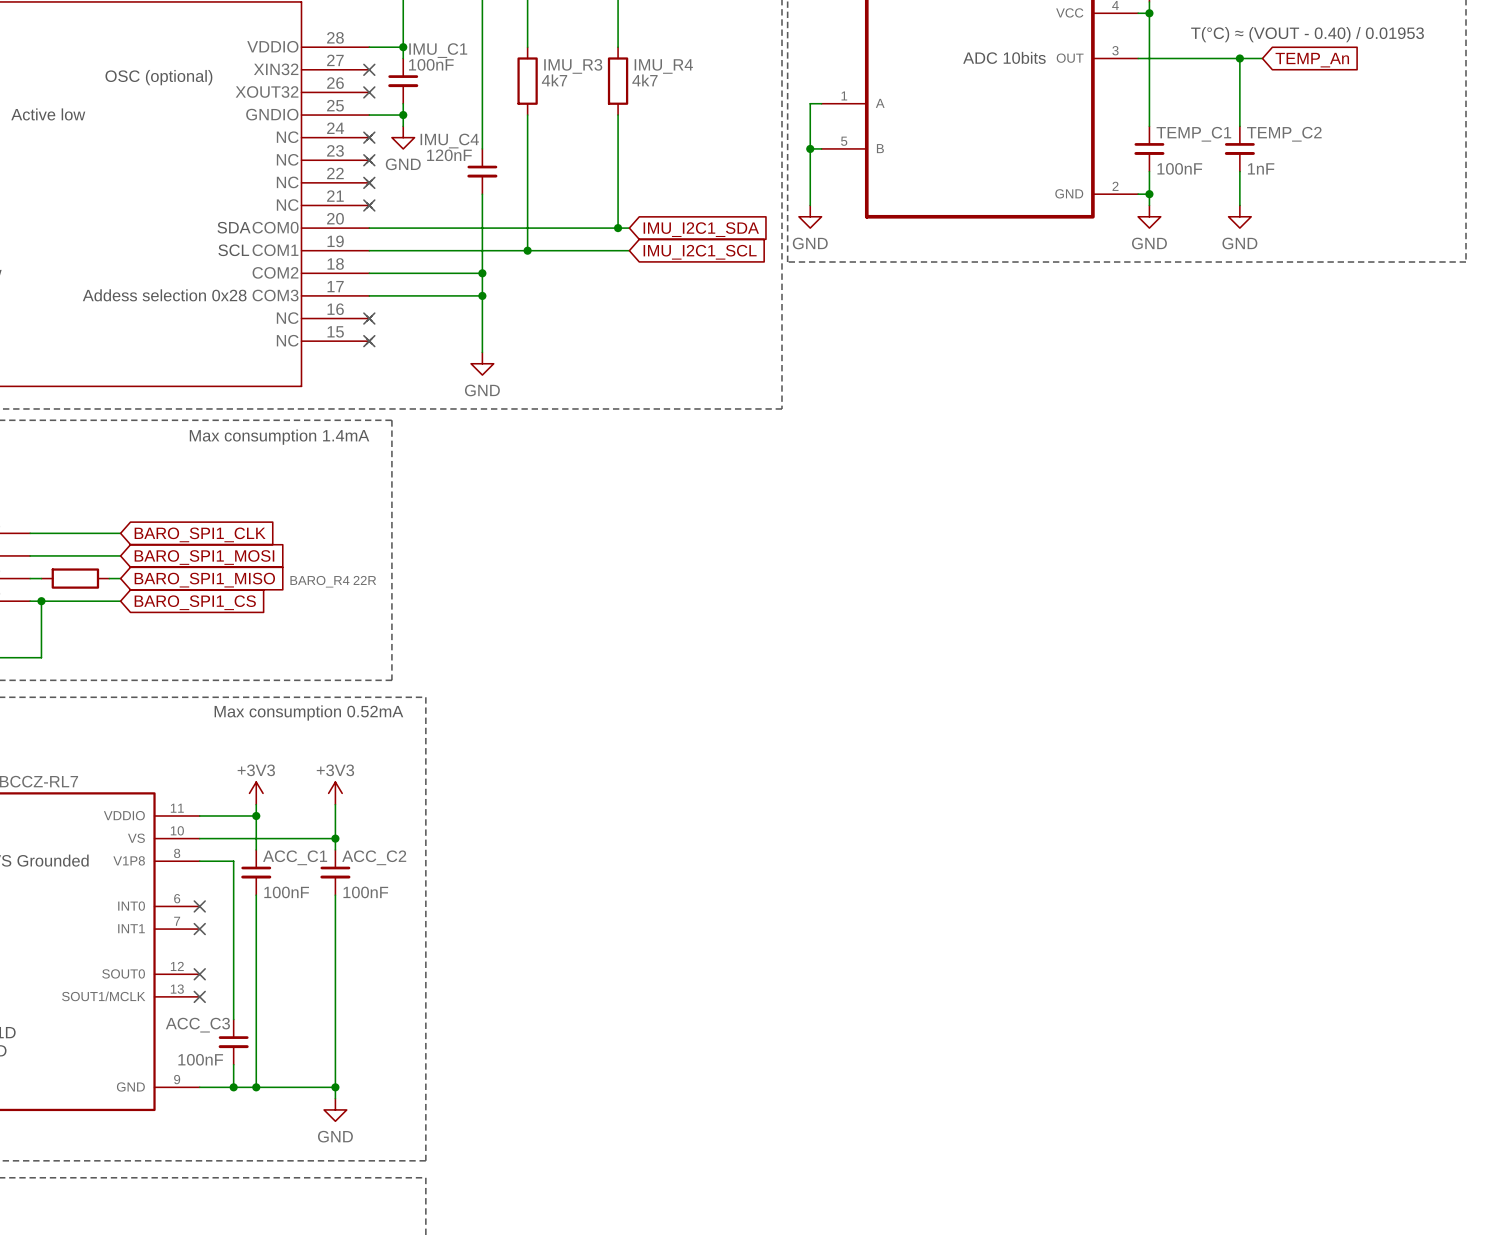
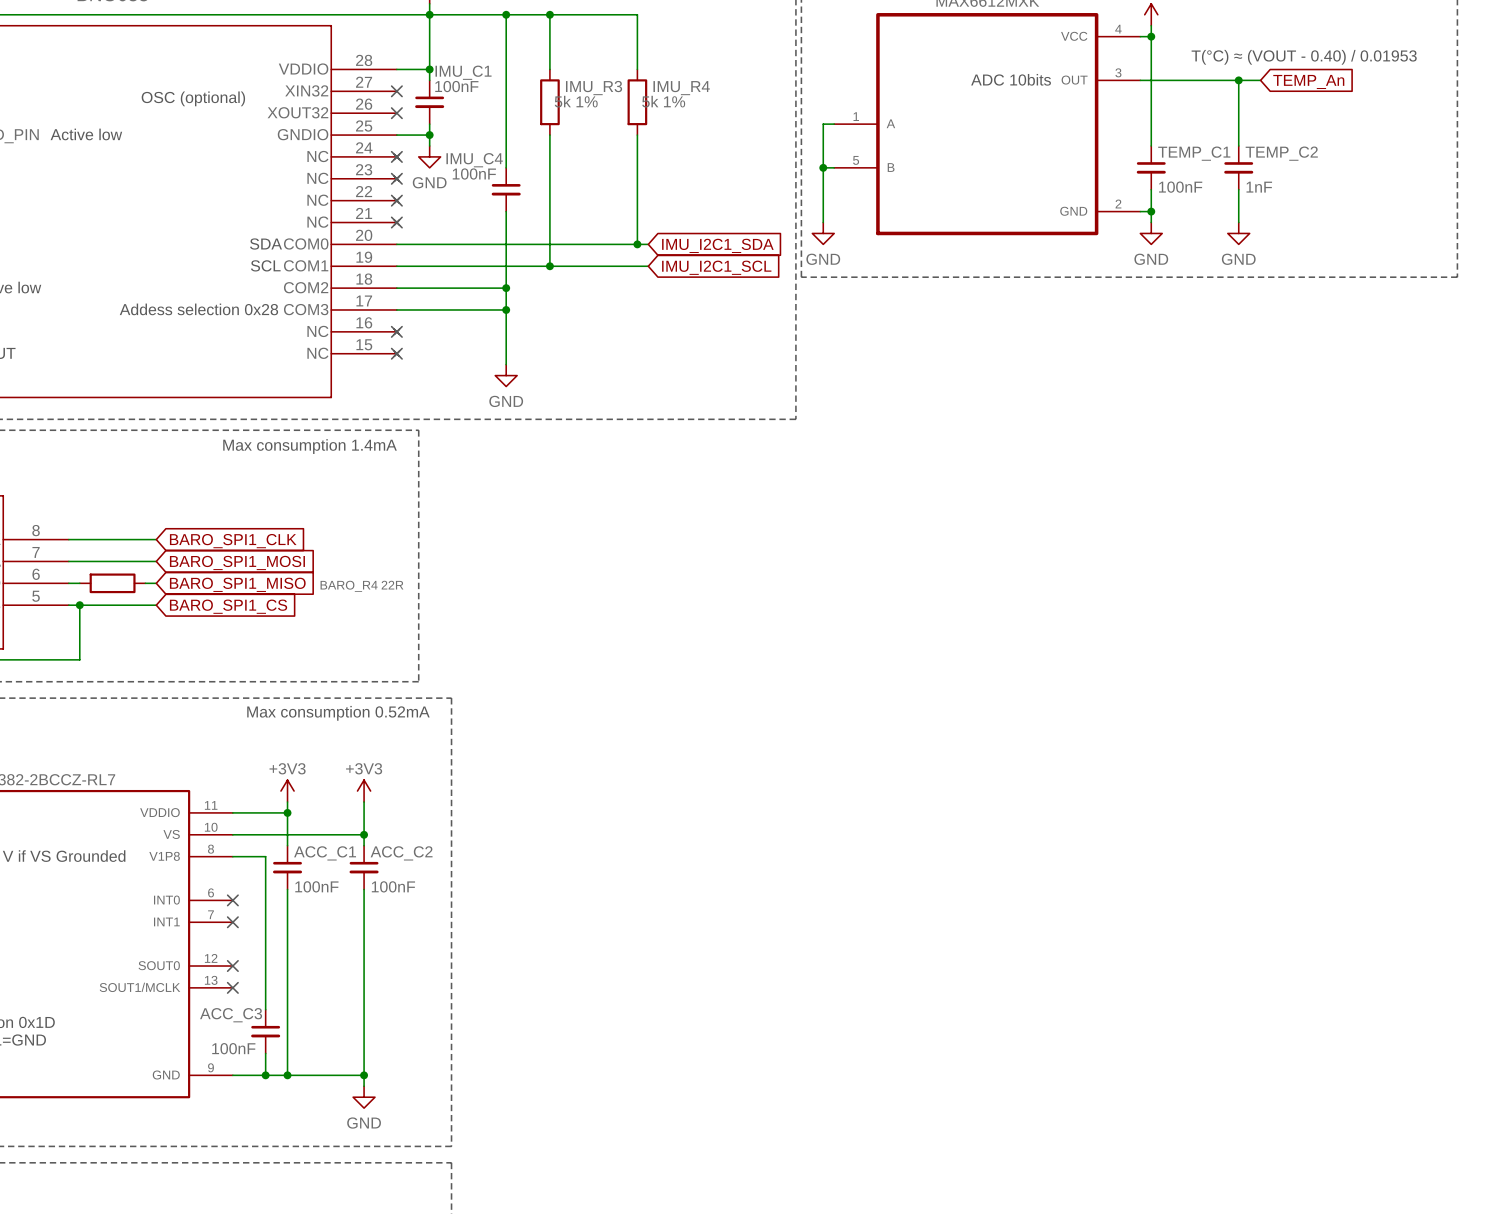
IMU_R3 value: 4k7 (554, 80) -> 5k 1% (576, 101)
IMU_R4 value: 4k7 (644, 80) -> 5k 1% (663, 101)
IMU_C4 value: 120nF (449, 155) -> 100nF (474, 174)

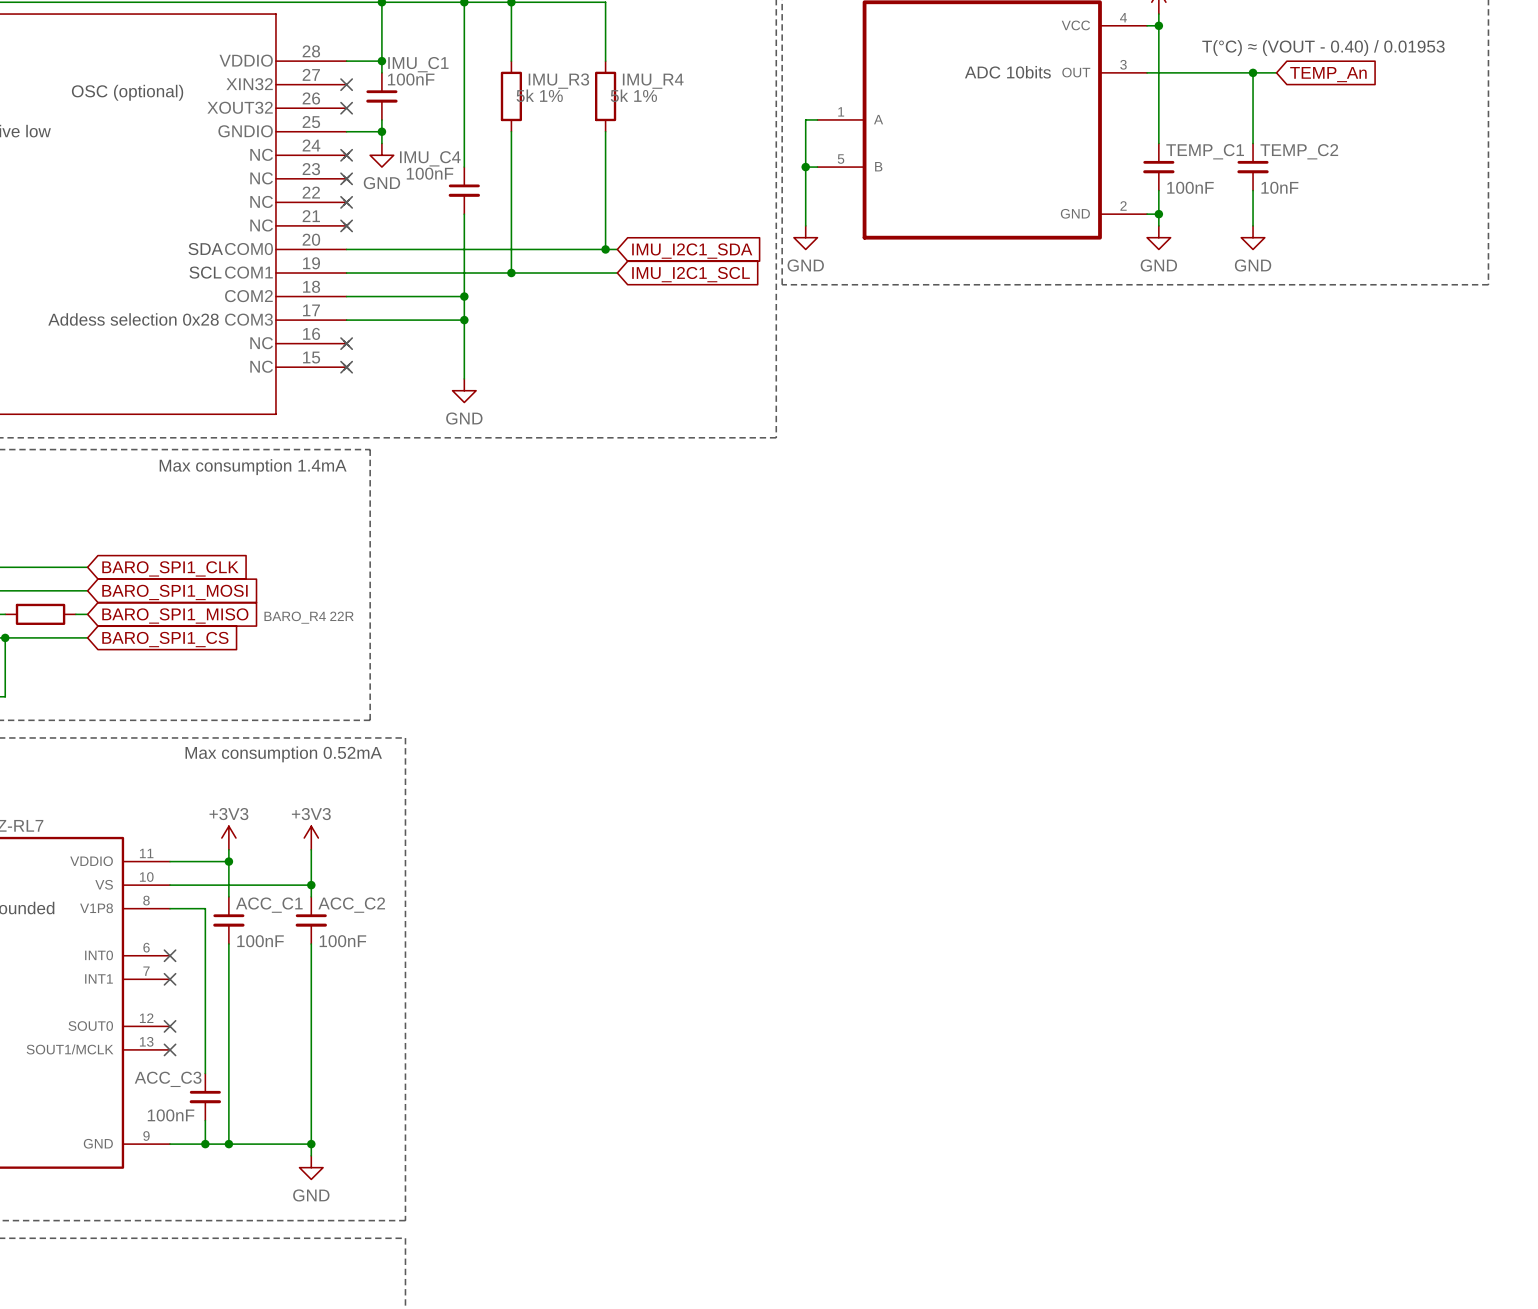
TEMP_C2 value: 1nF (1259, 187) -> 10nF (1279, 187)

